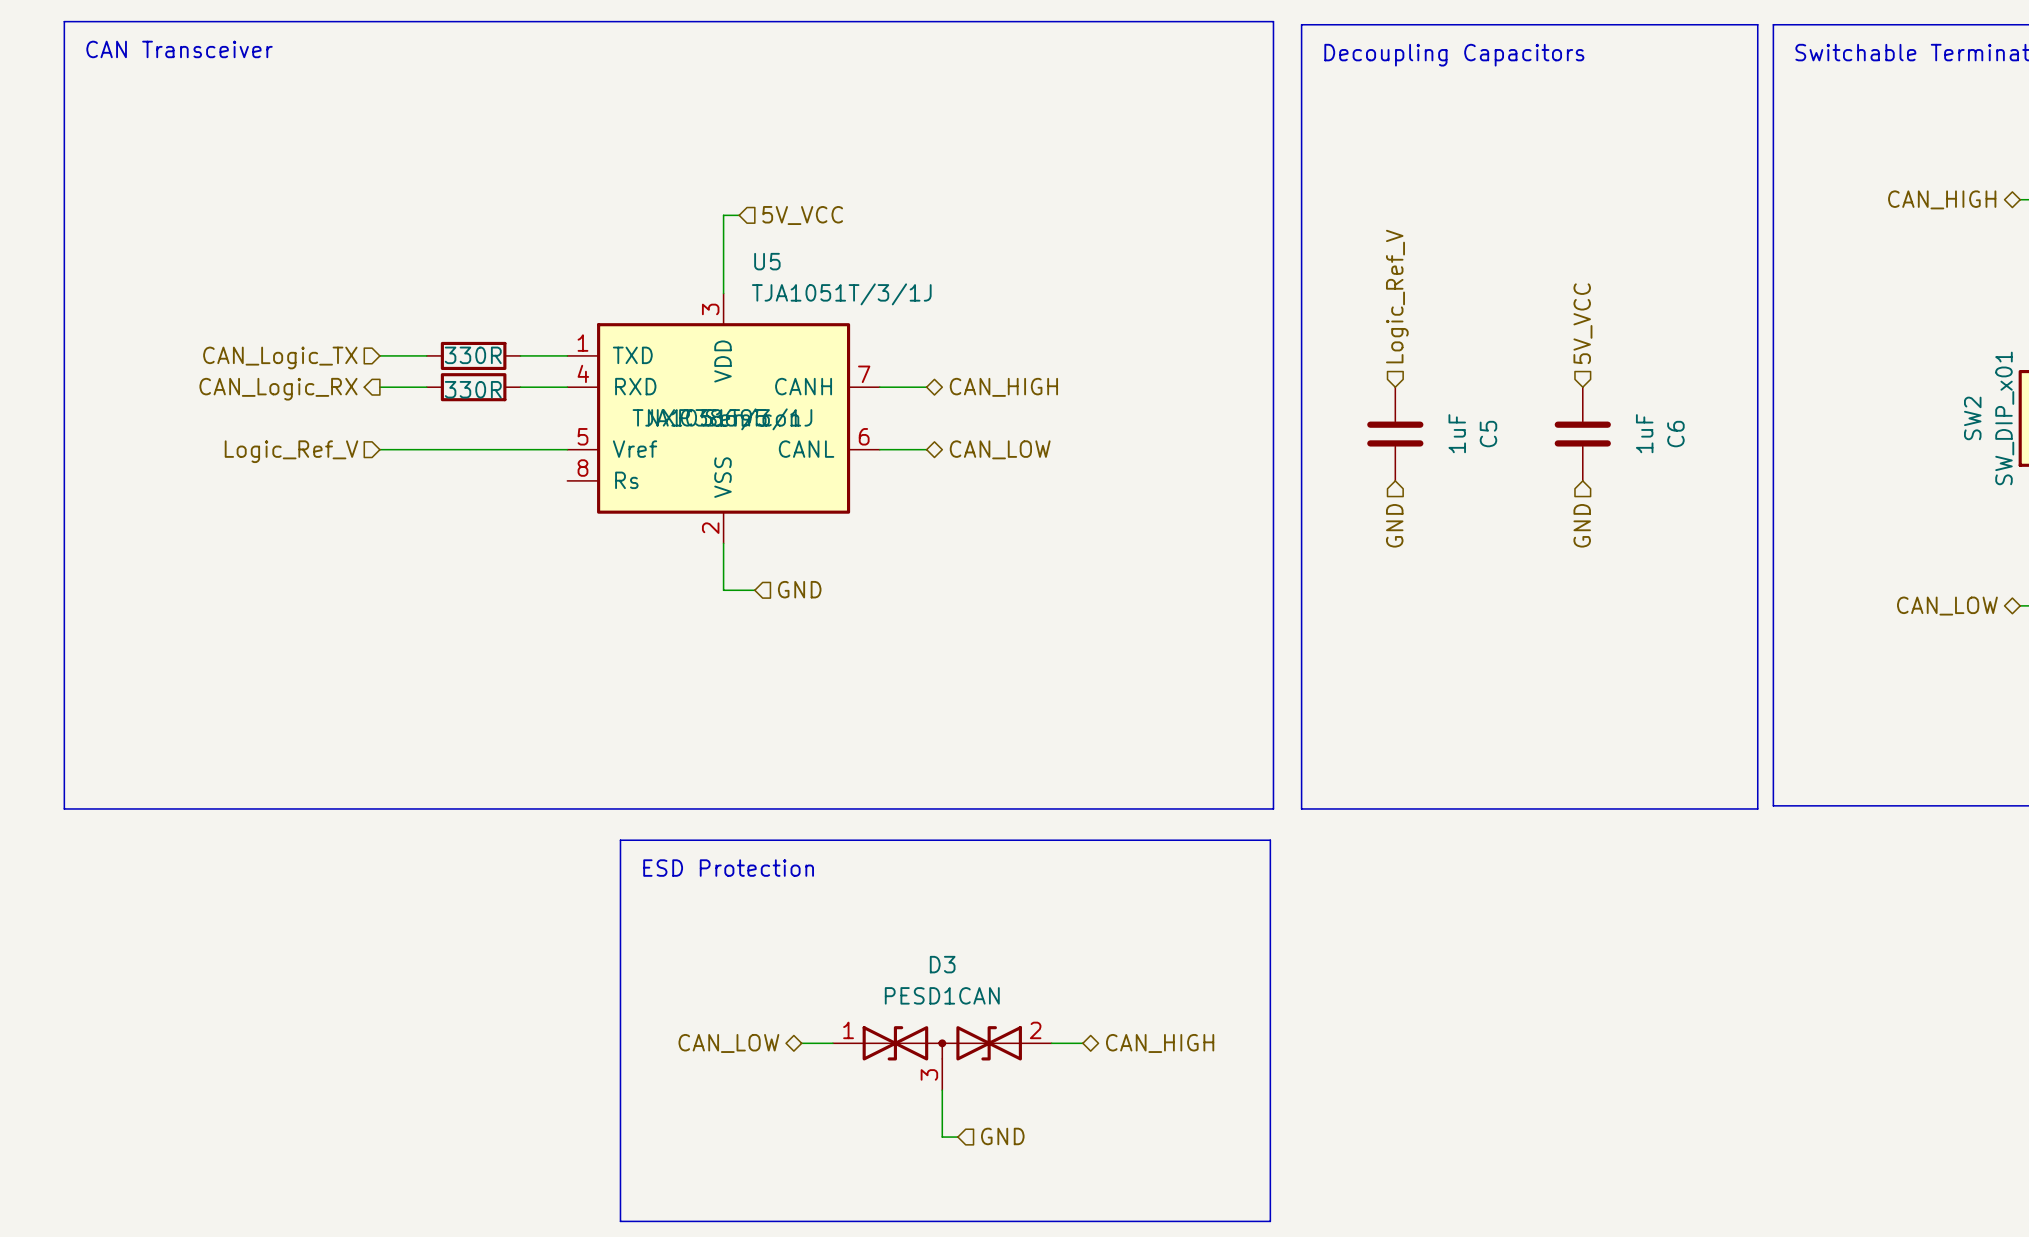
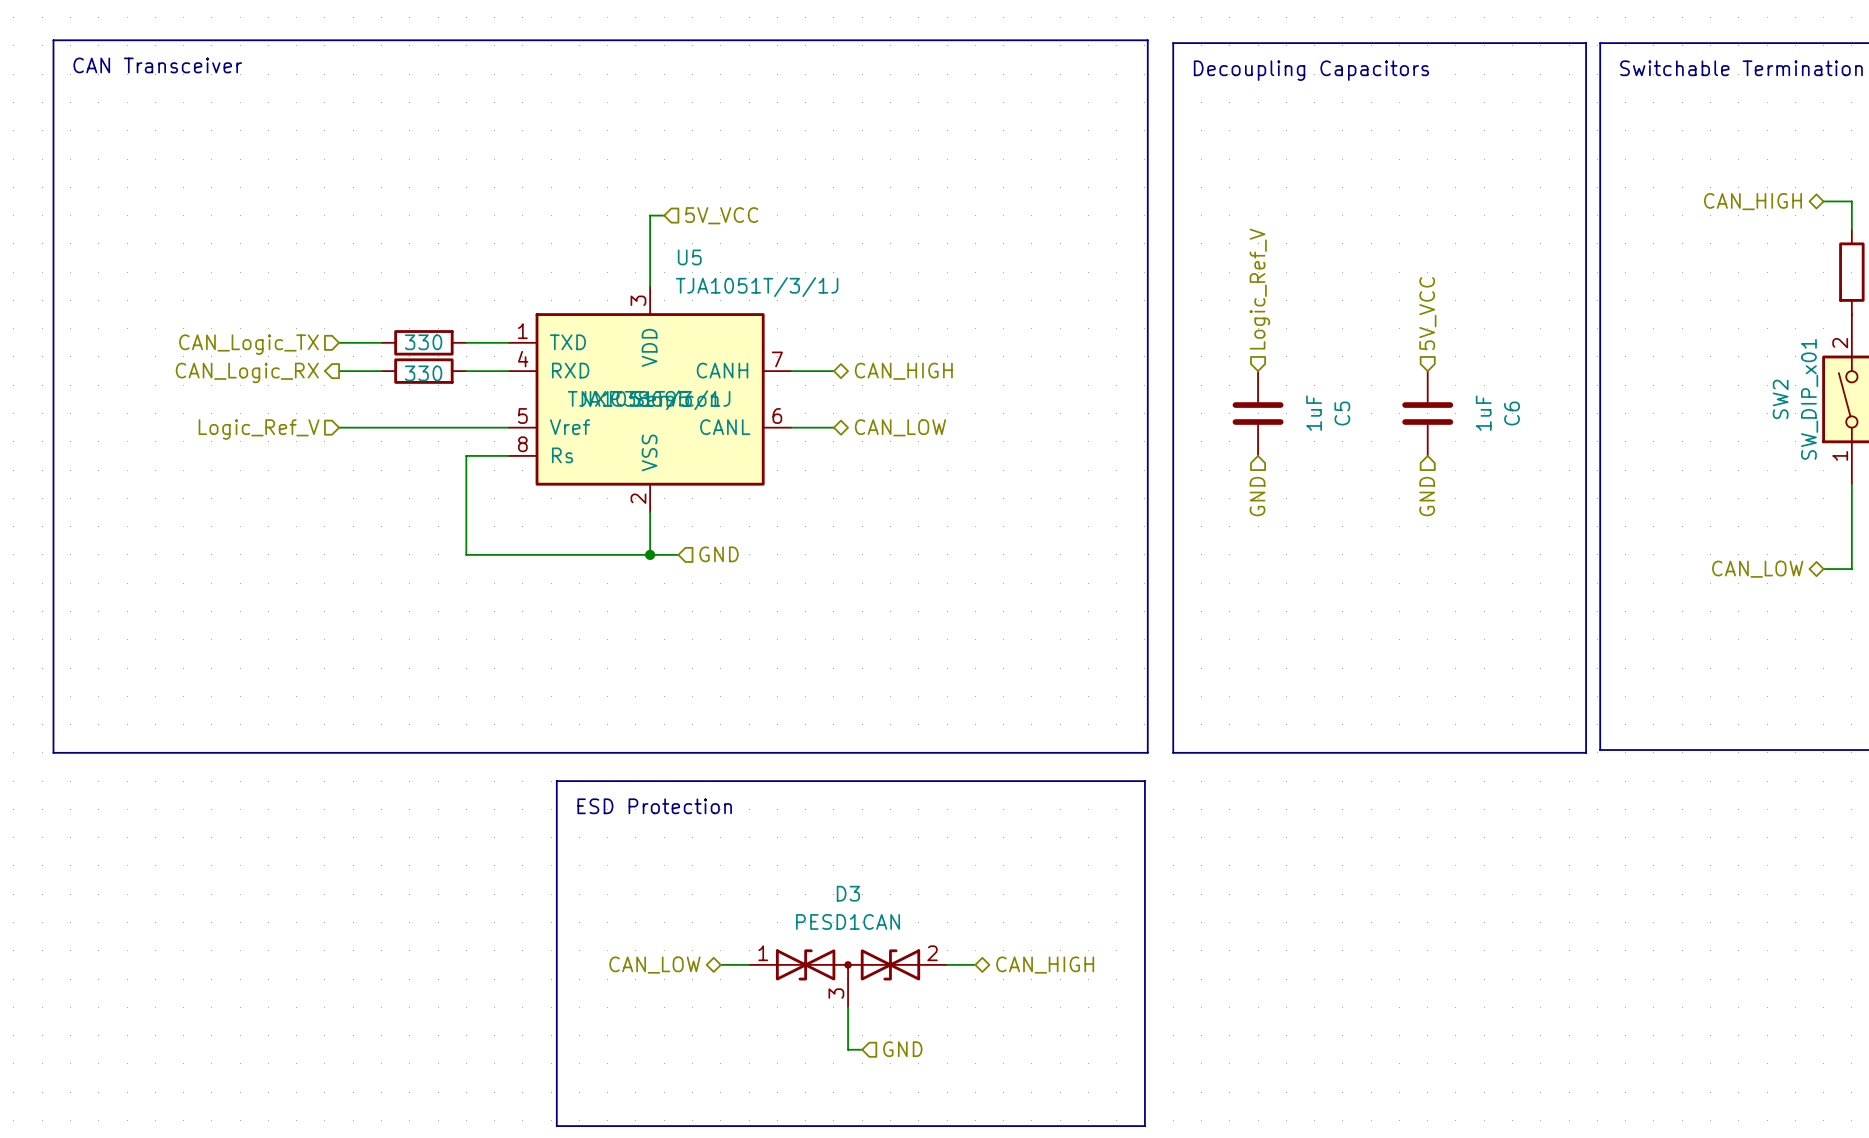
part value: 330R (473, 355) -> 330 (423, 342)
part value: 330R (473, 389) -> 330 (423, 373)
wire: none -> (508, 455) (466, 455) (466, 554) (650, 554)
junction: none -> (650, 554)

